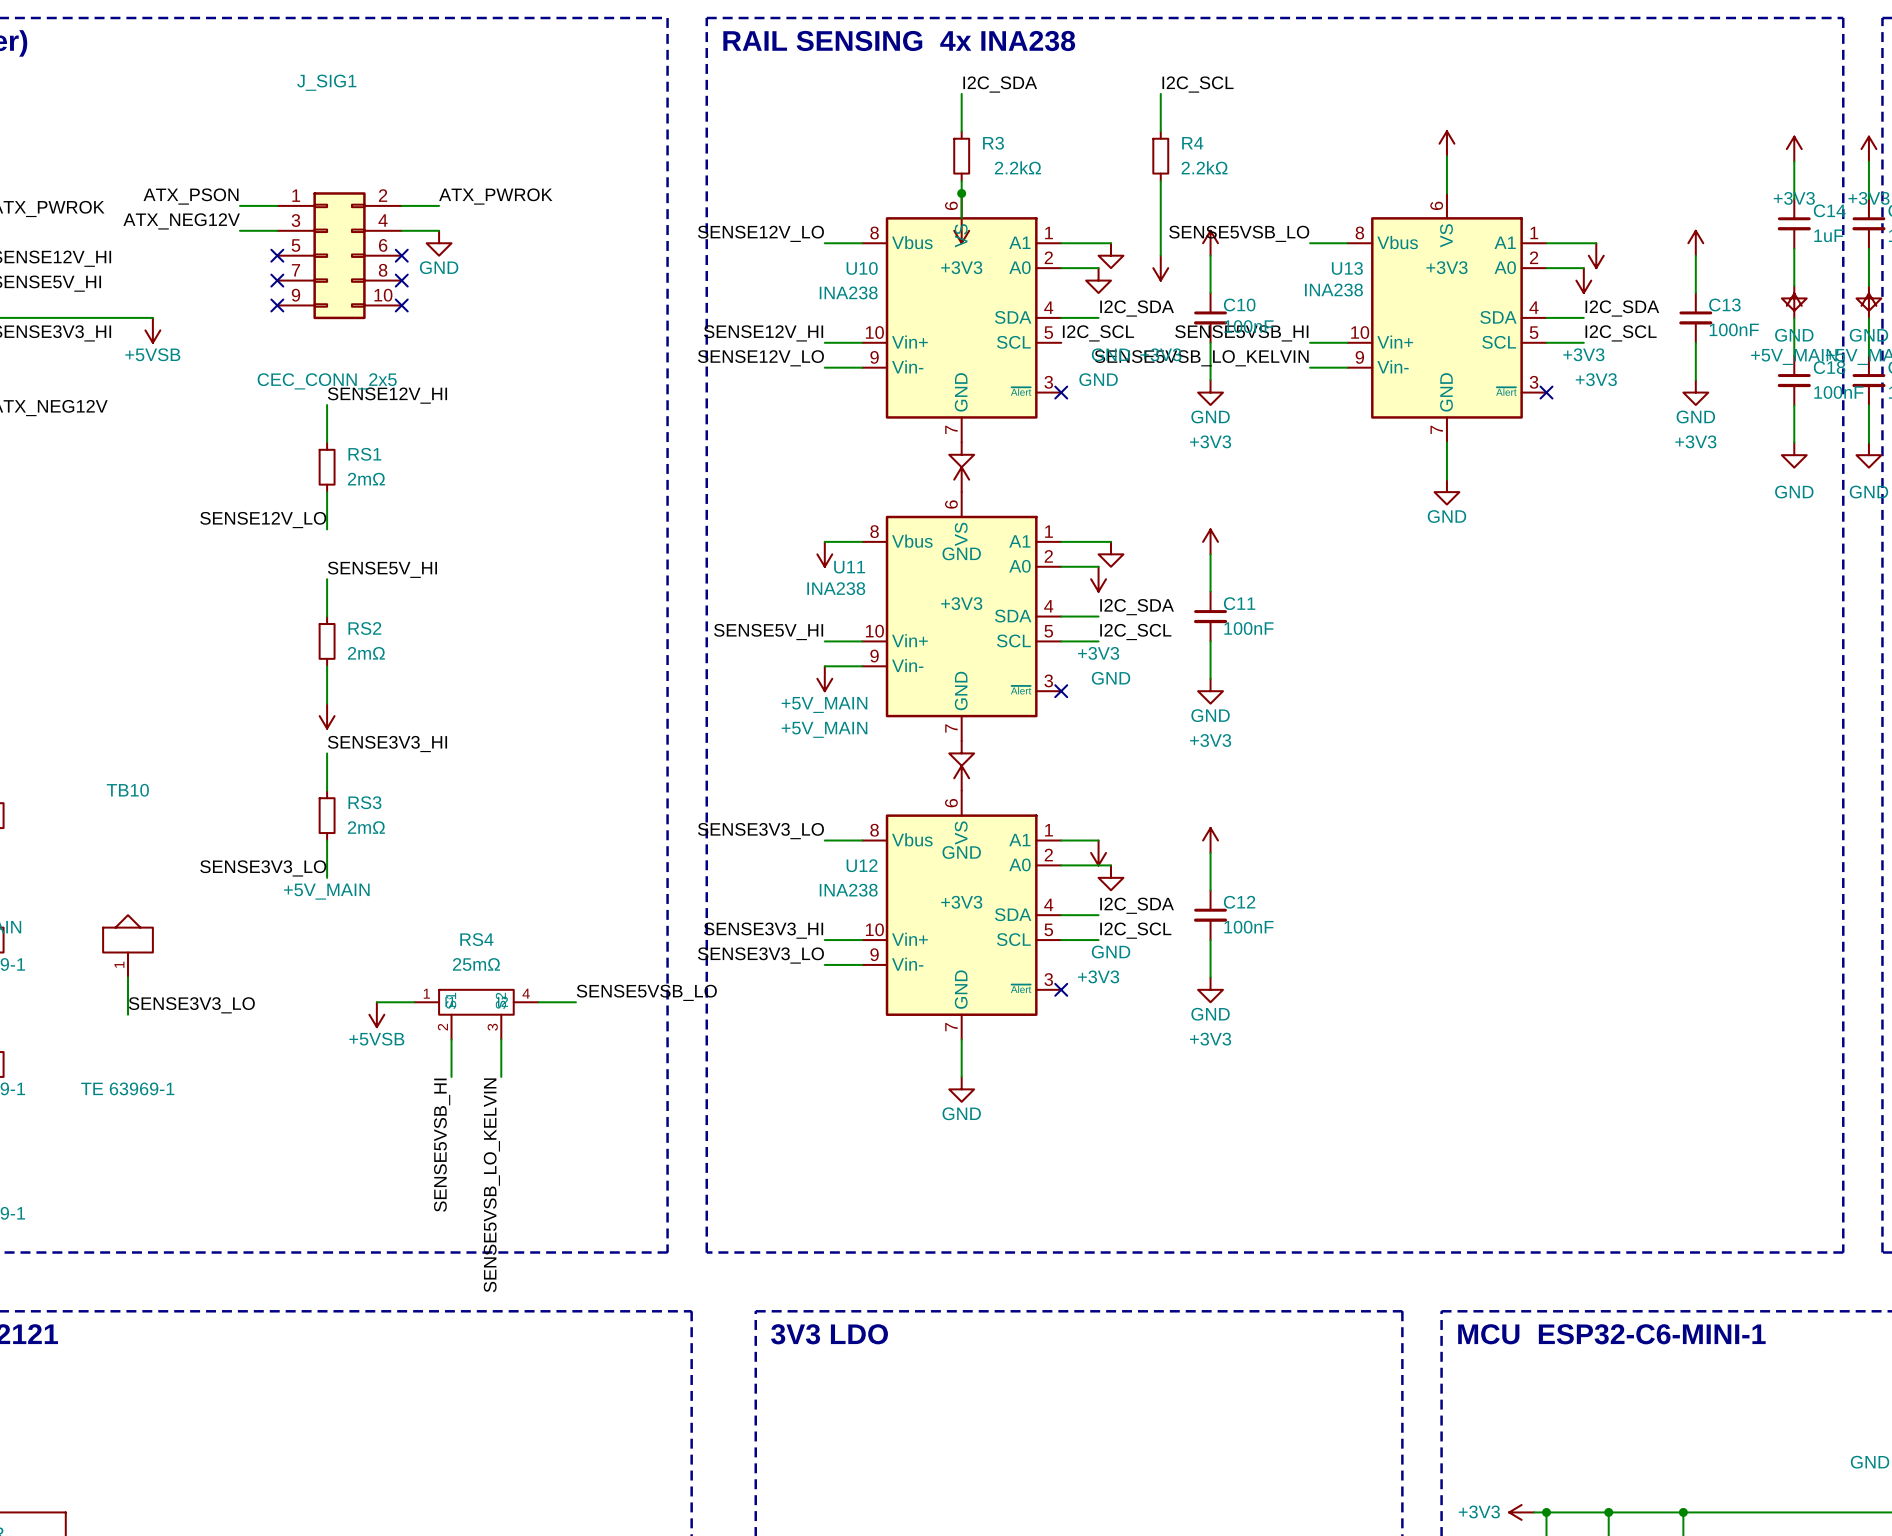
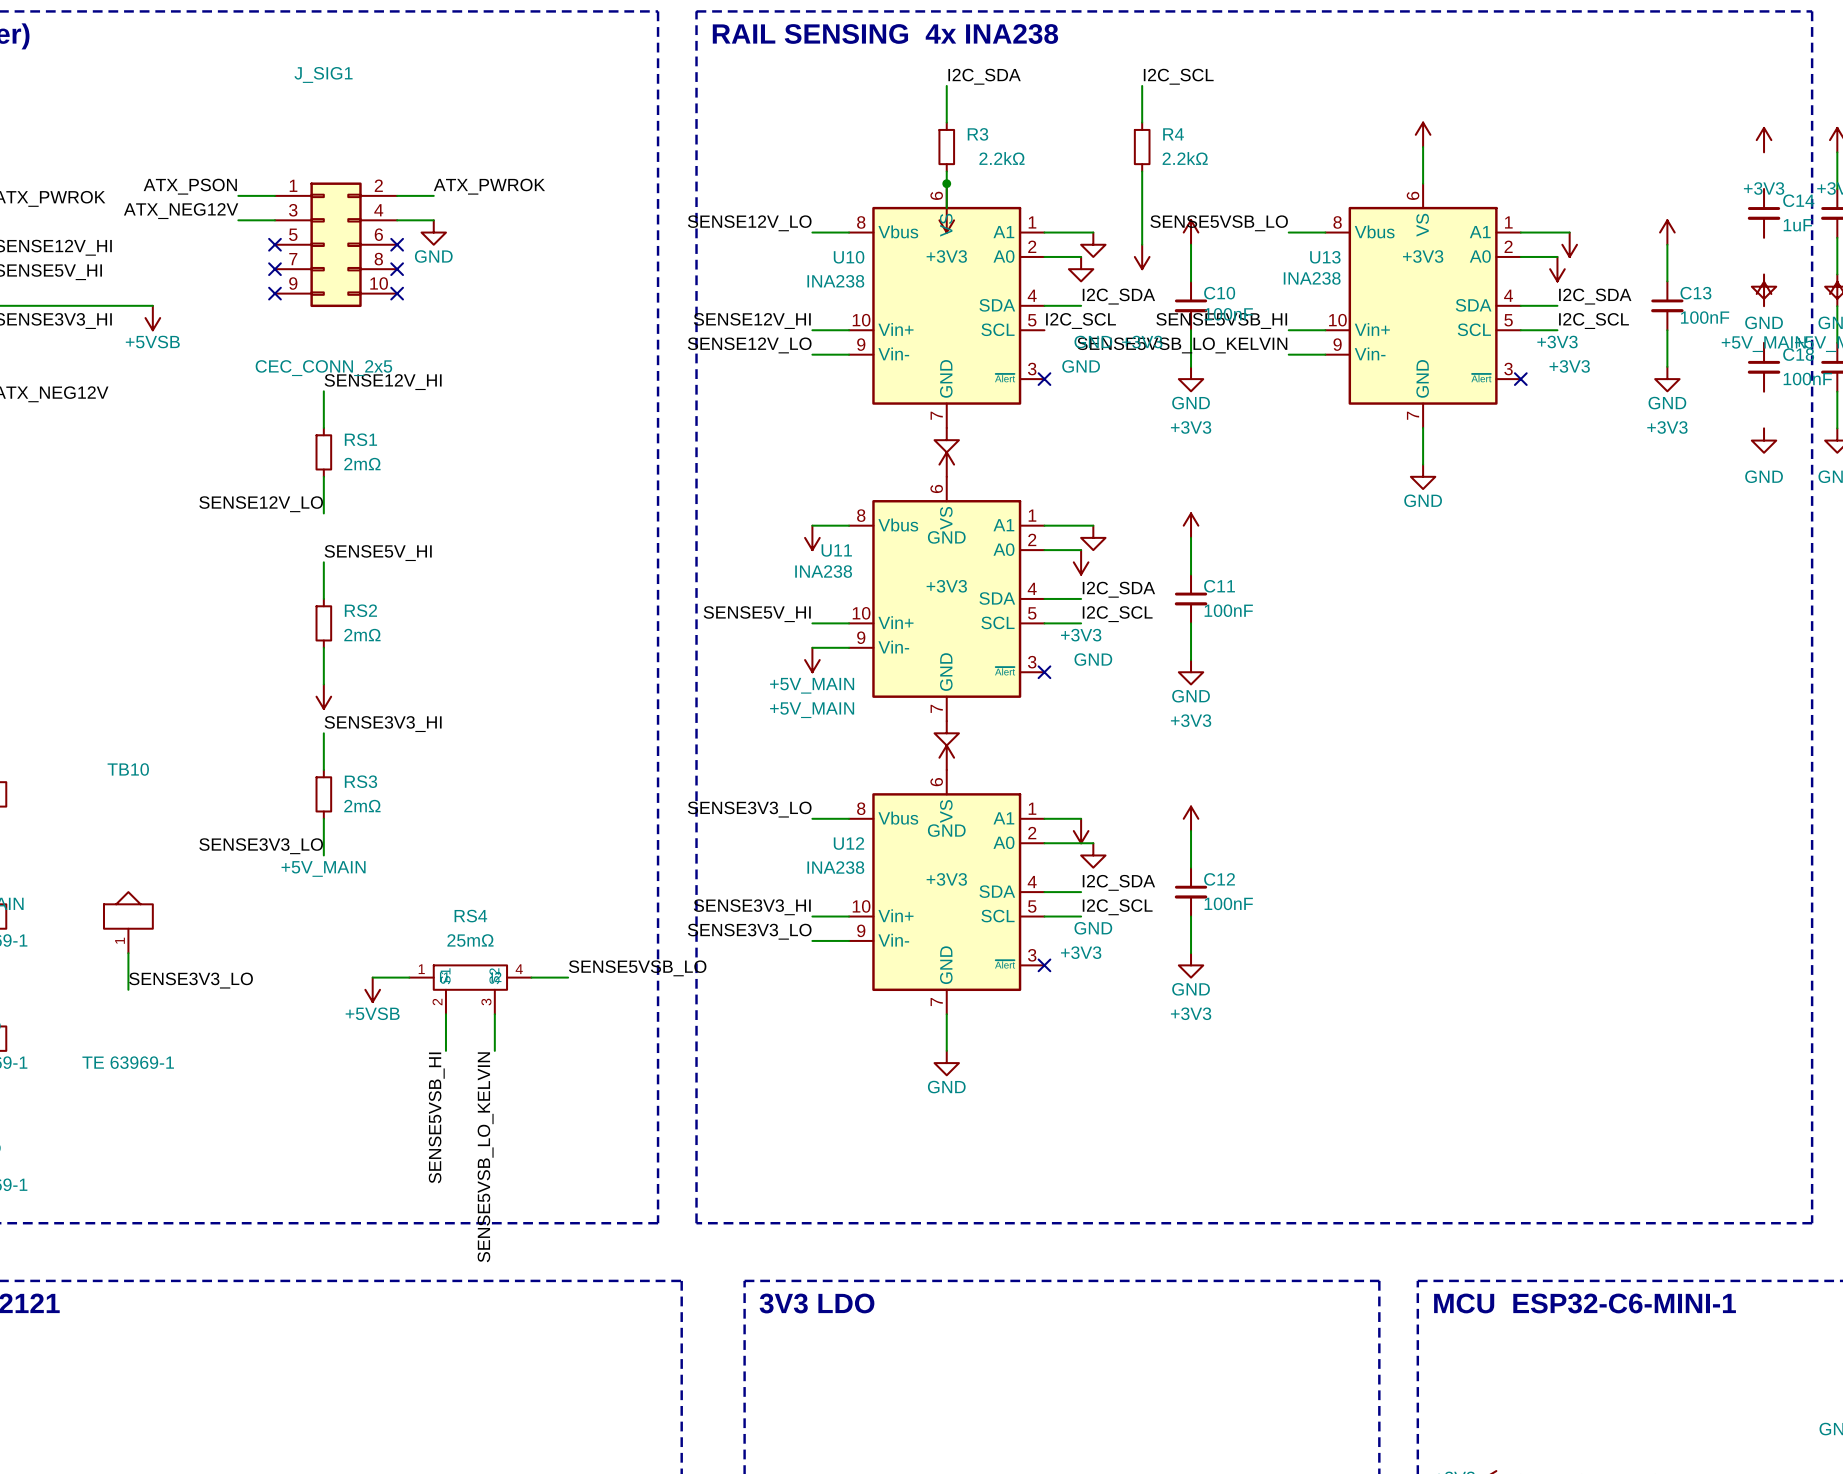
wire: (1794, 161) (1794, 198) -> none
wire: (1794, 248) (1794, 285) -> none
wire: (1794, 318) (1794, 355) -> none
wire: (1794, 405) (1794, 442) -> none

